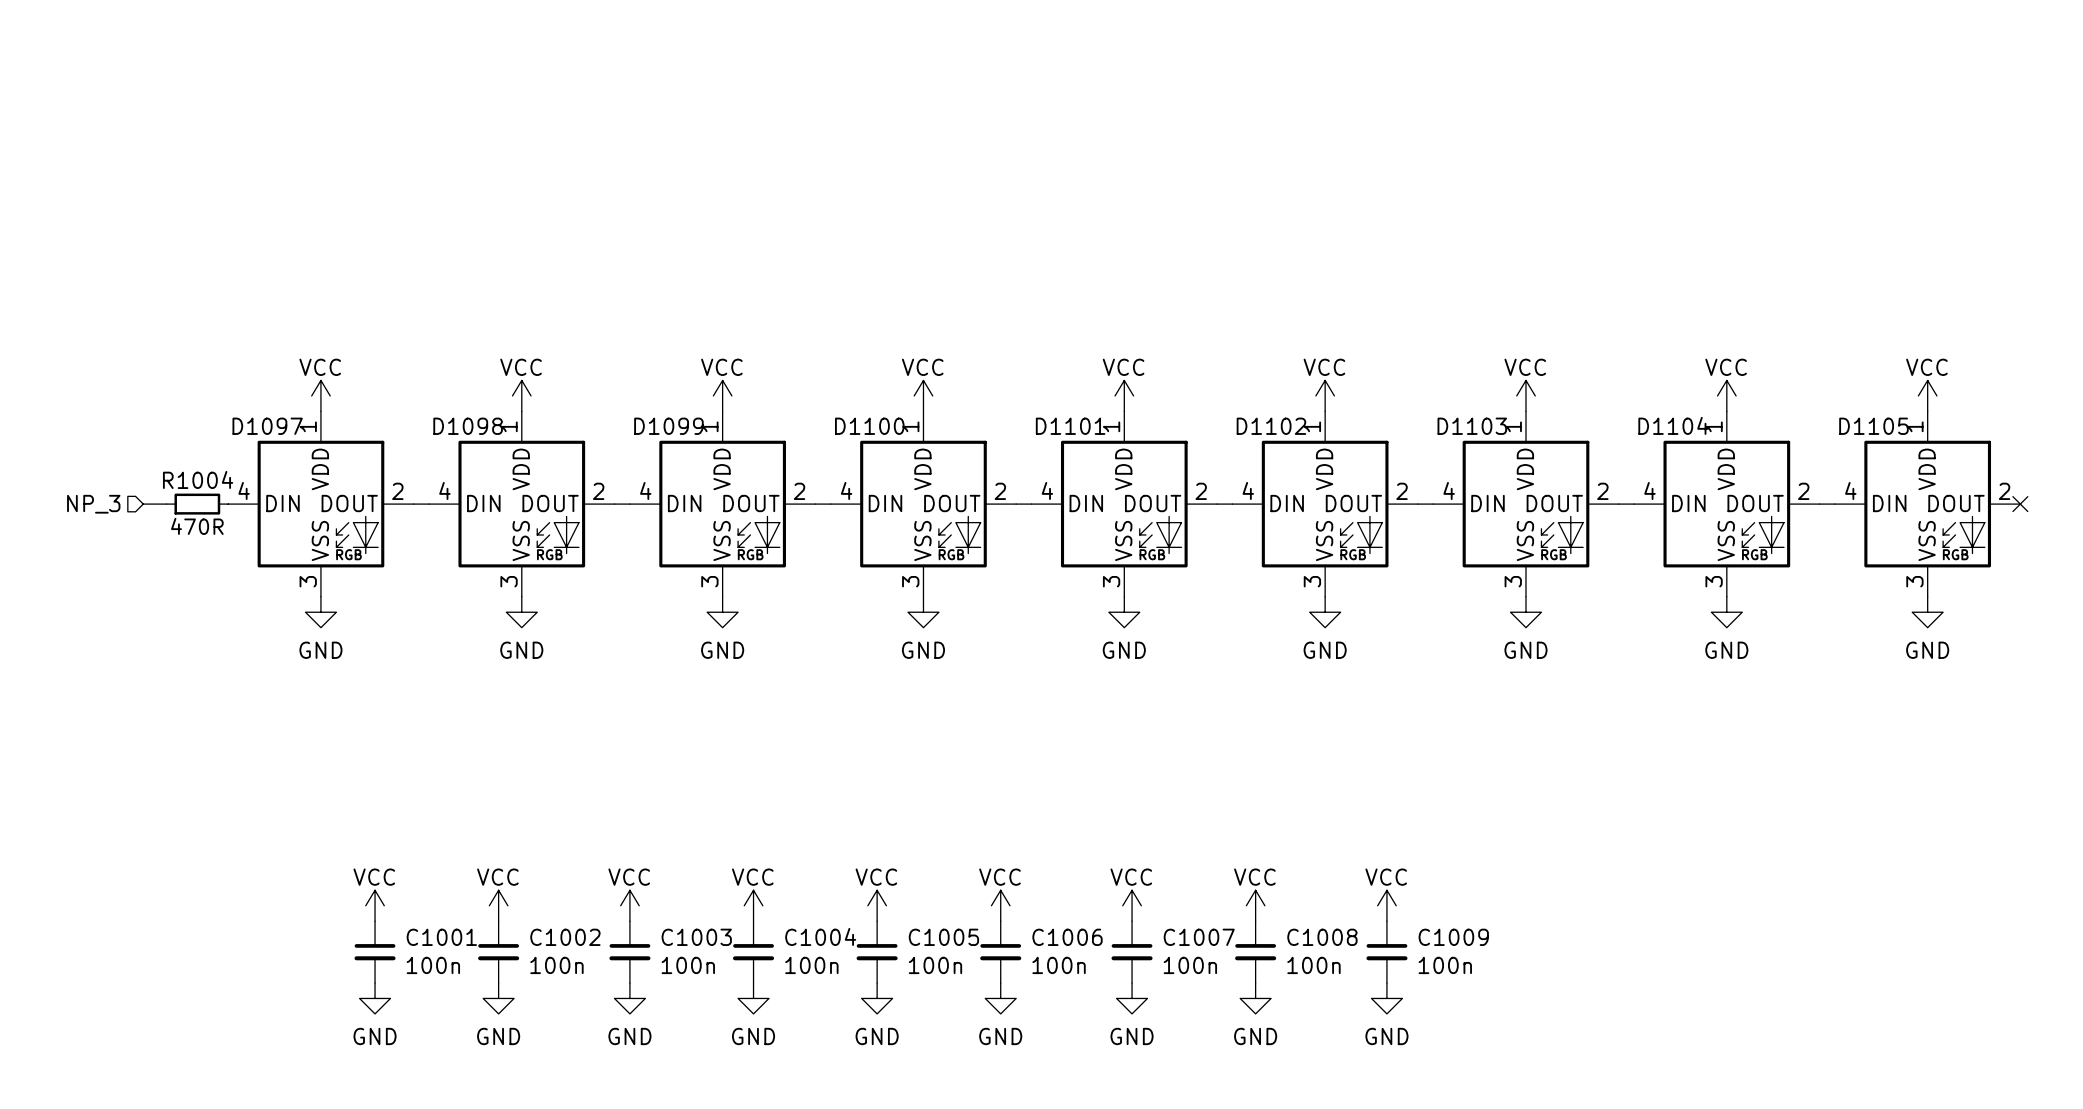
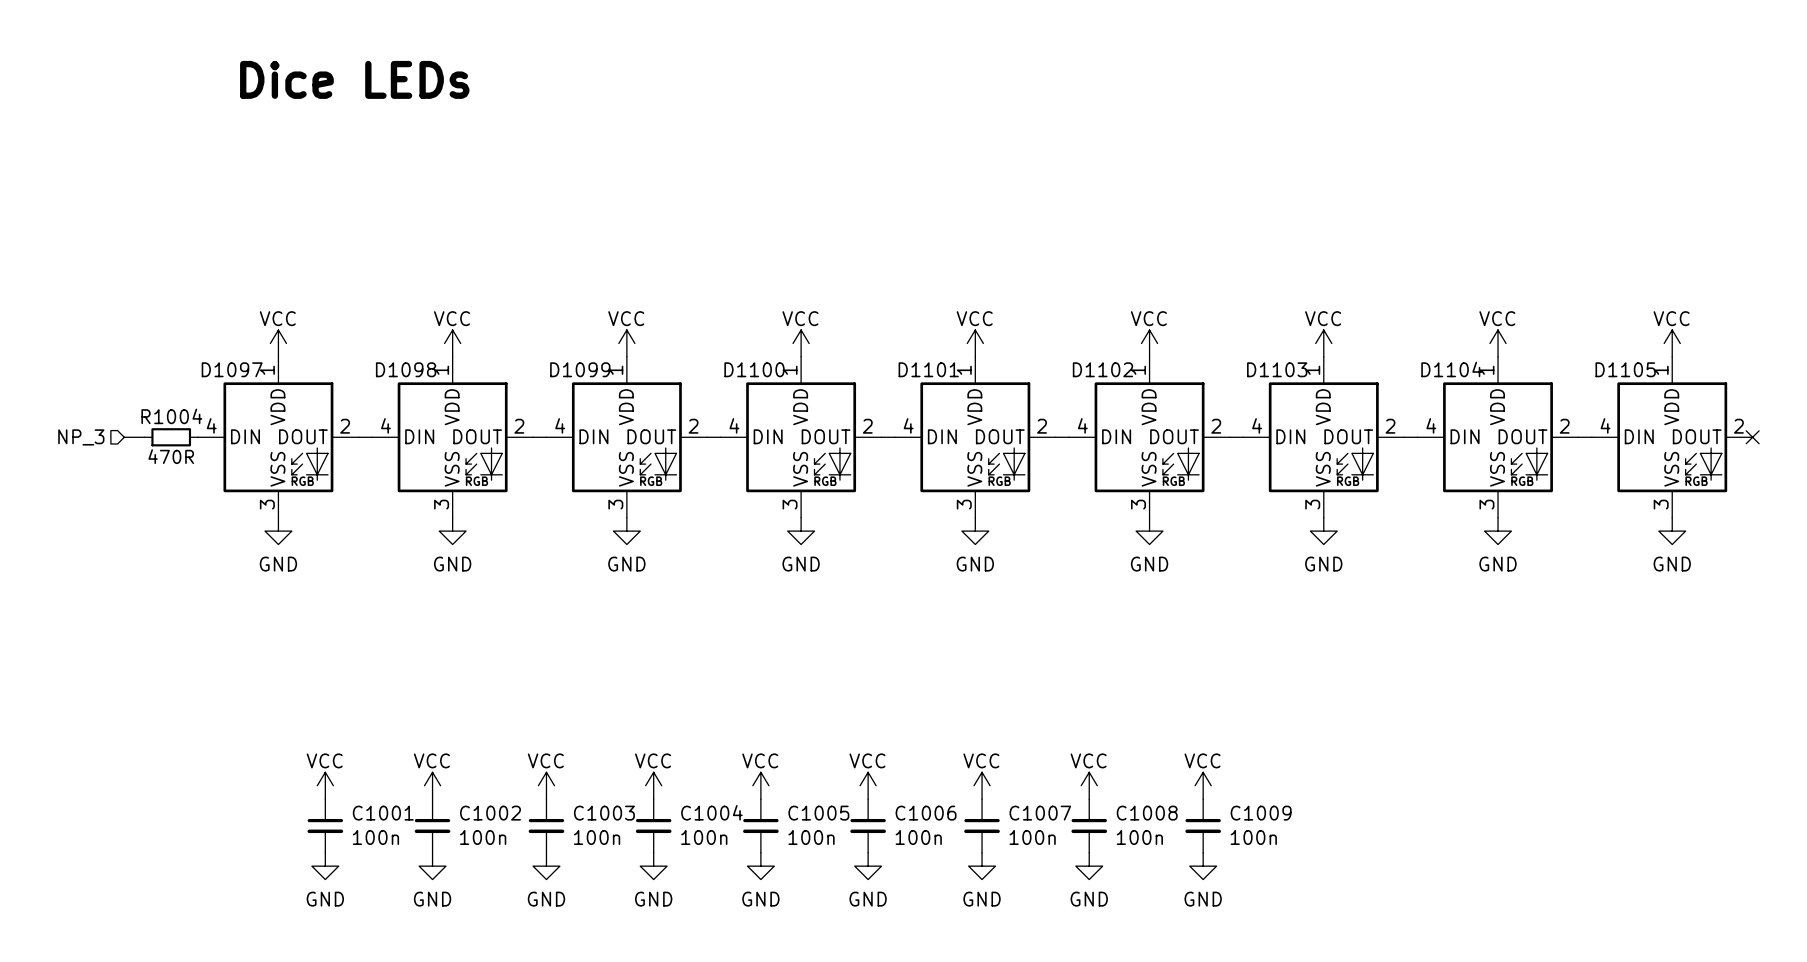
text: none -> Dice LEDs (354, 79)

